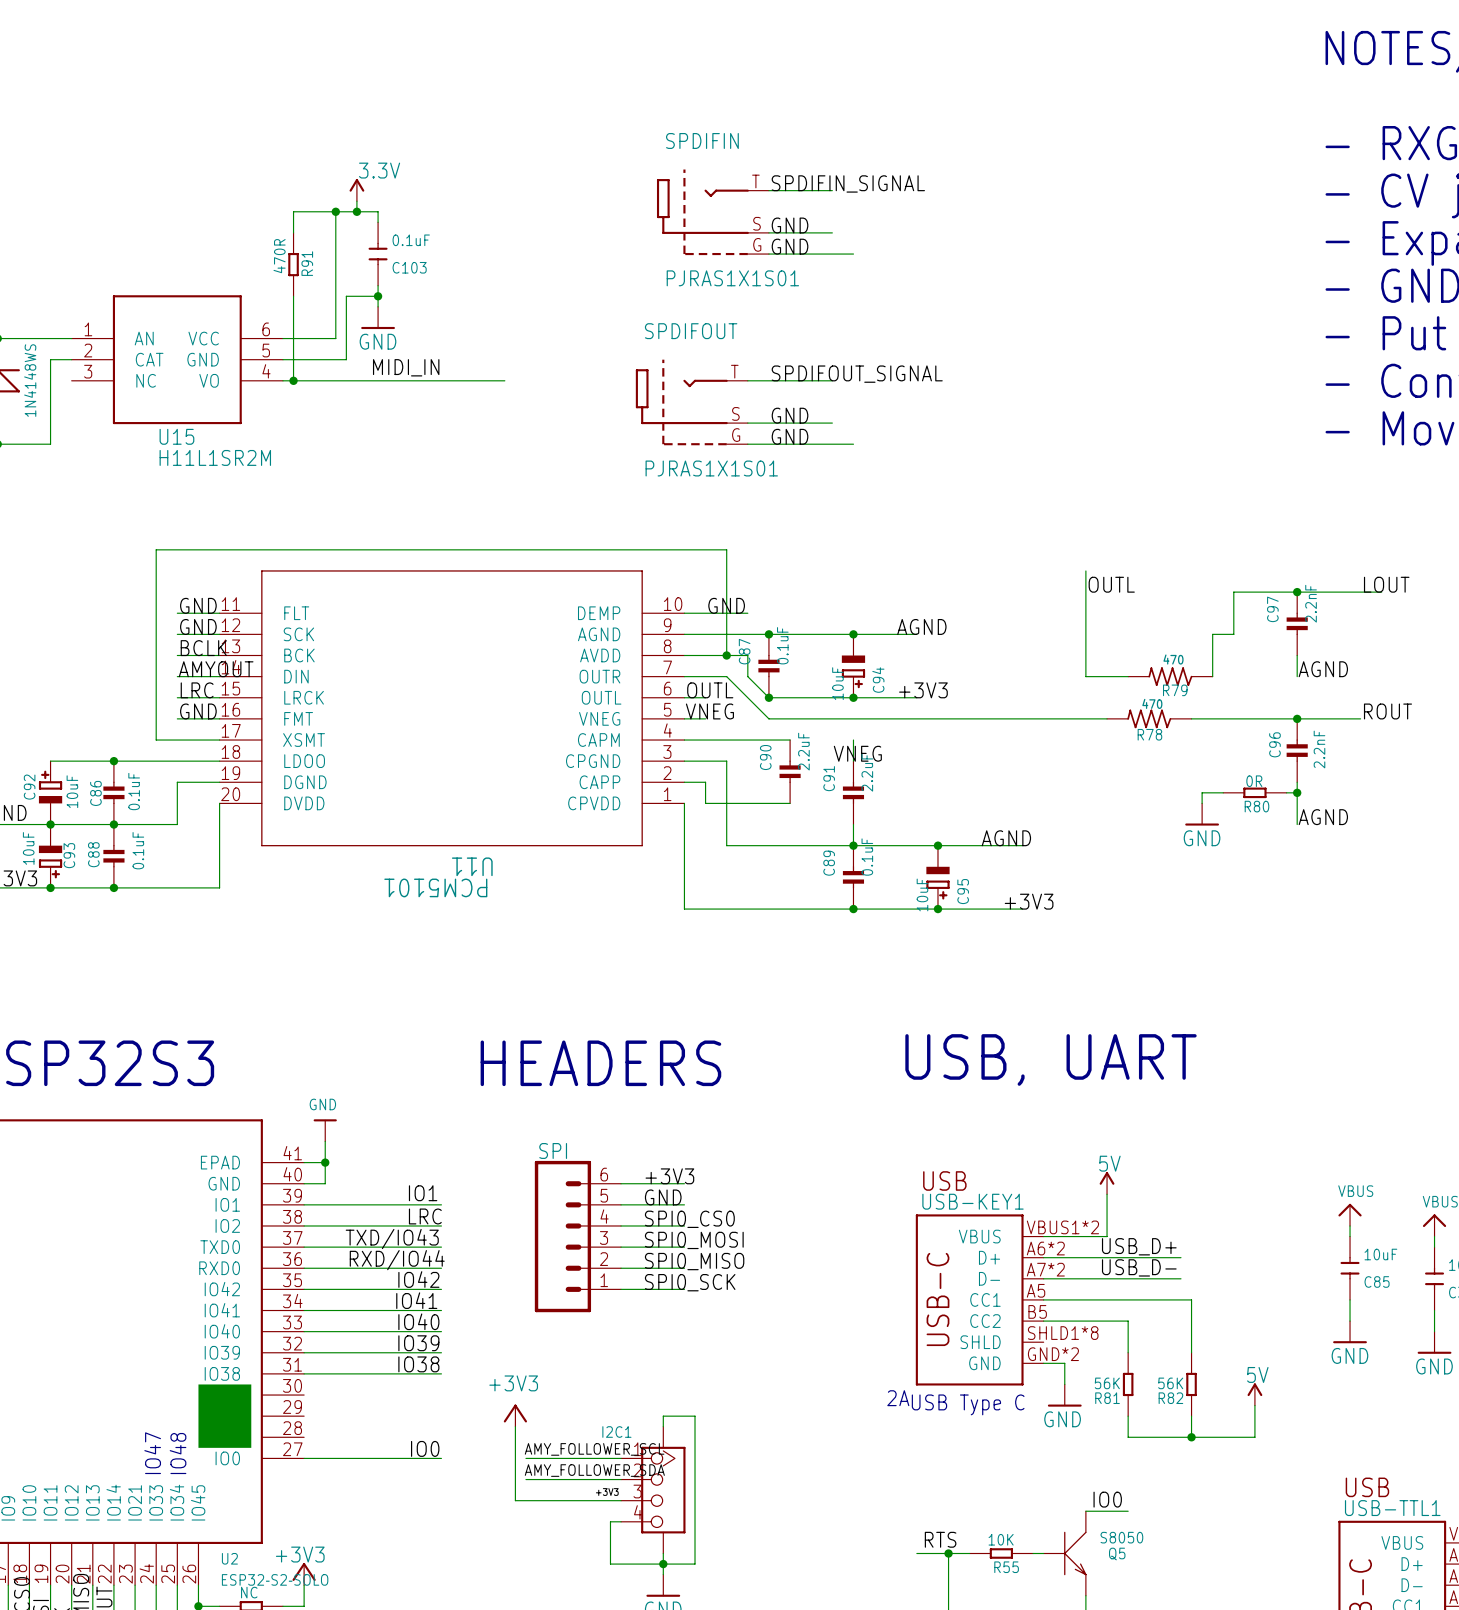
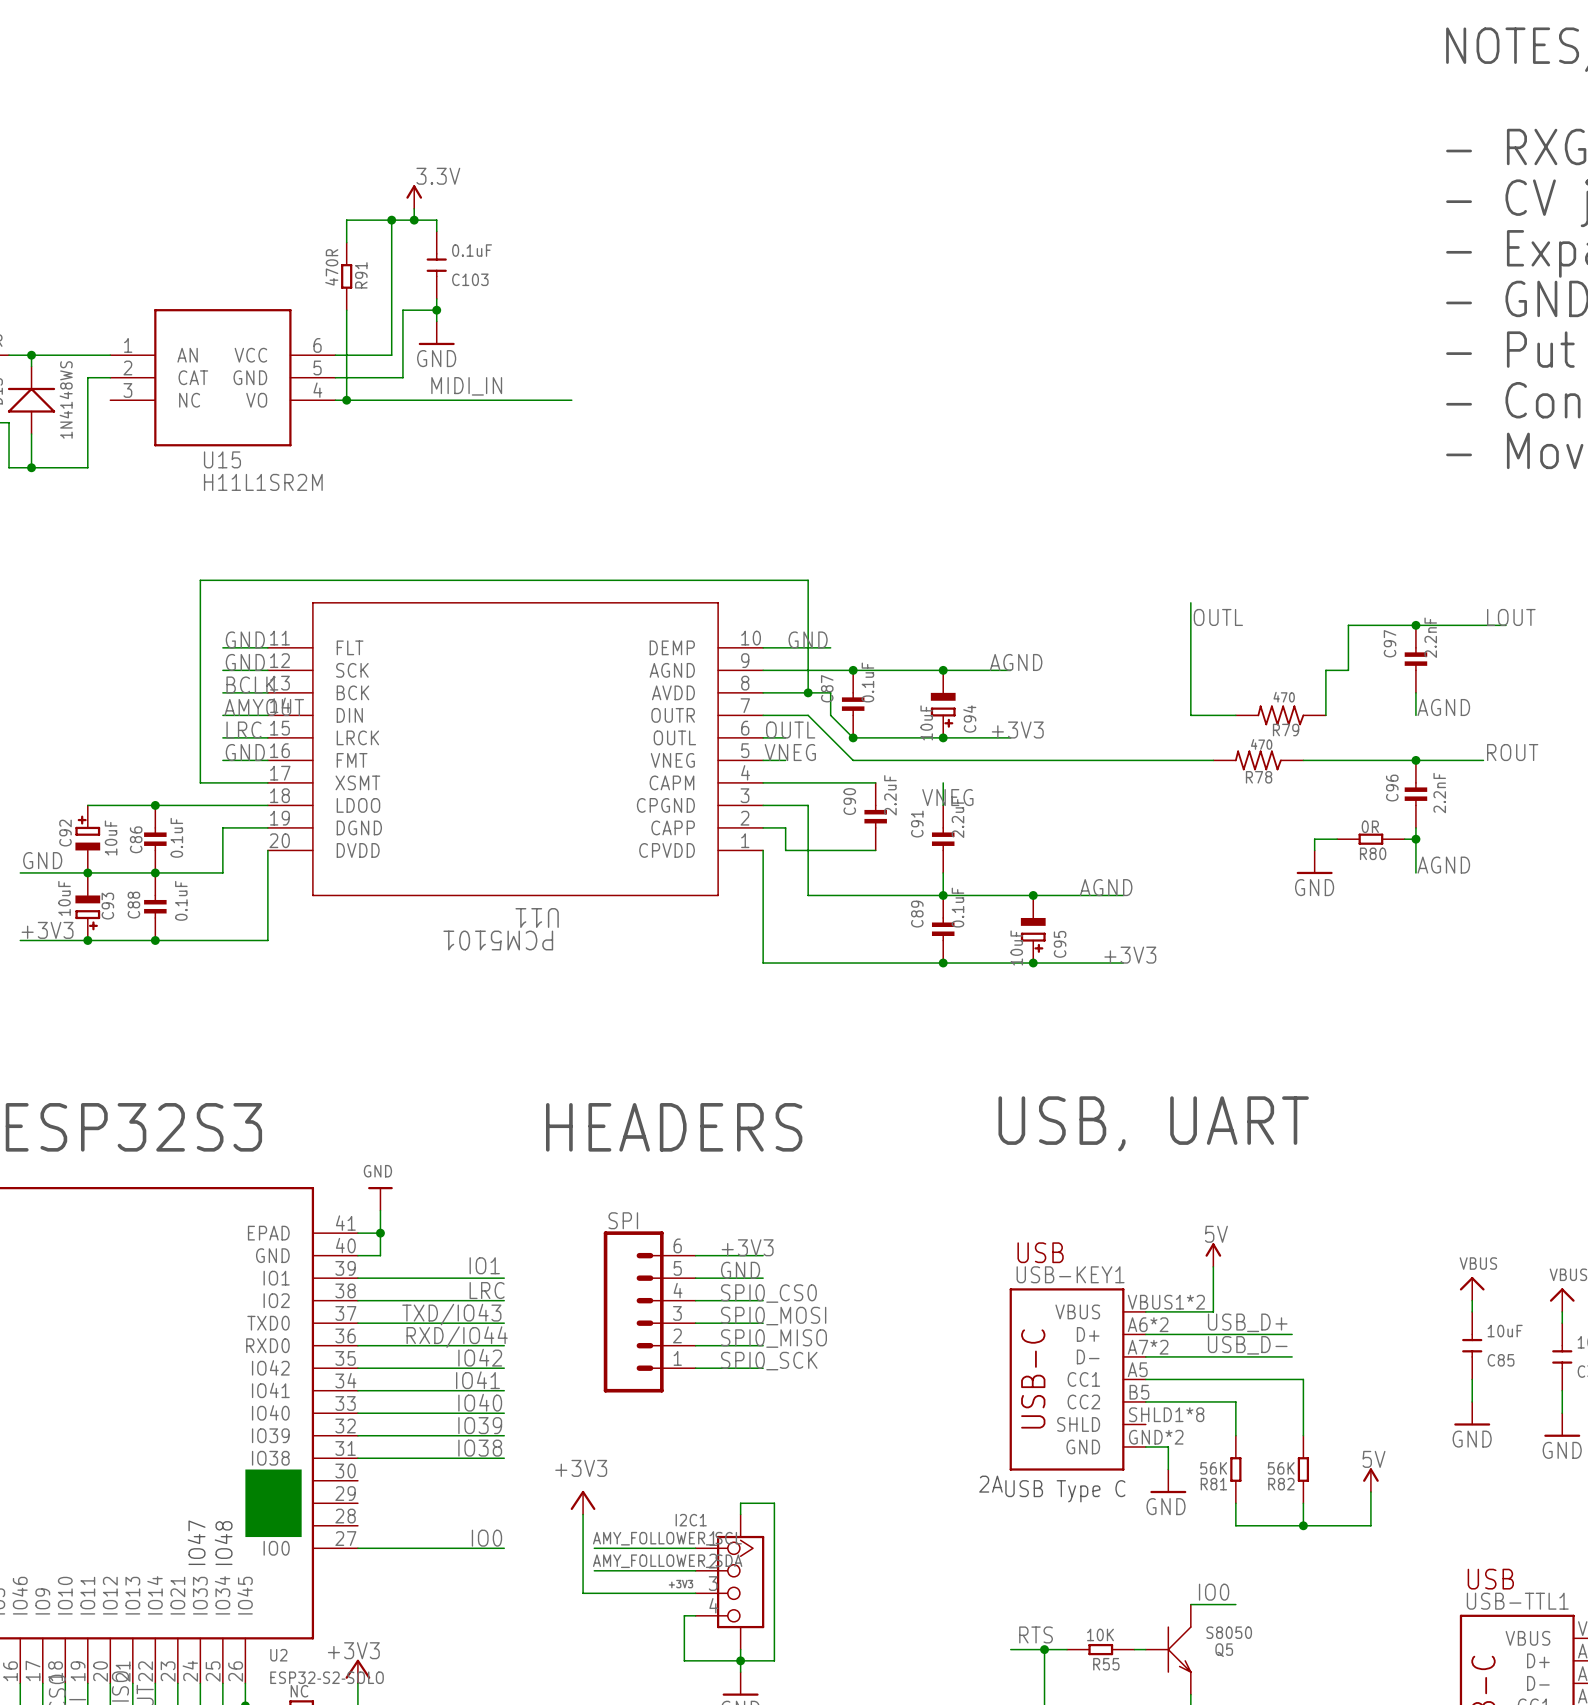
label: SPDIFIN_SIGNAL (848, 183) -> none
wire: (768, 190) (832, 190) -> none
SPDIFIN: PJRAS1X1S01 (712, 211) -> none
label: GND (790, 225) -> none
wire: (768, 232) (832, 232) -> none
label: GND (790, 246) -> none
wire: (768, 254) (853, 254) -> none
label: SPDIFOUT_SIGNAL (857, 374) -> none
wire: (747, 380) (832, 380) -> none
SPDIFOUT: PJRAS1X1S01 (691, 401) -> none
label: GND (790, 415) -> none
wire: (747, 423) (832, 423) -> none
label: GND (790, 436) -> none
wire: (747, 444) (853, 444) -> none

